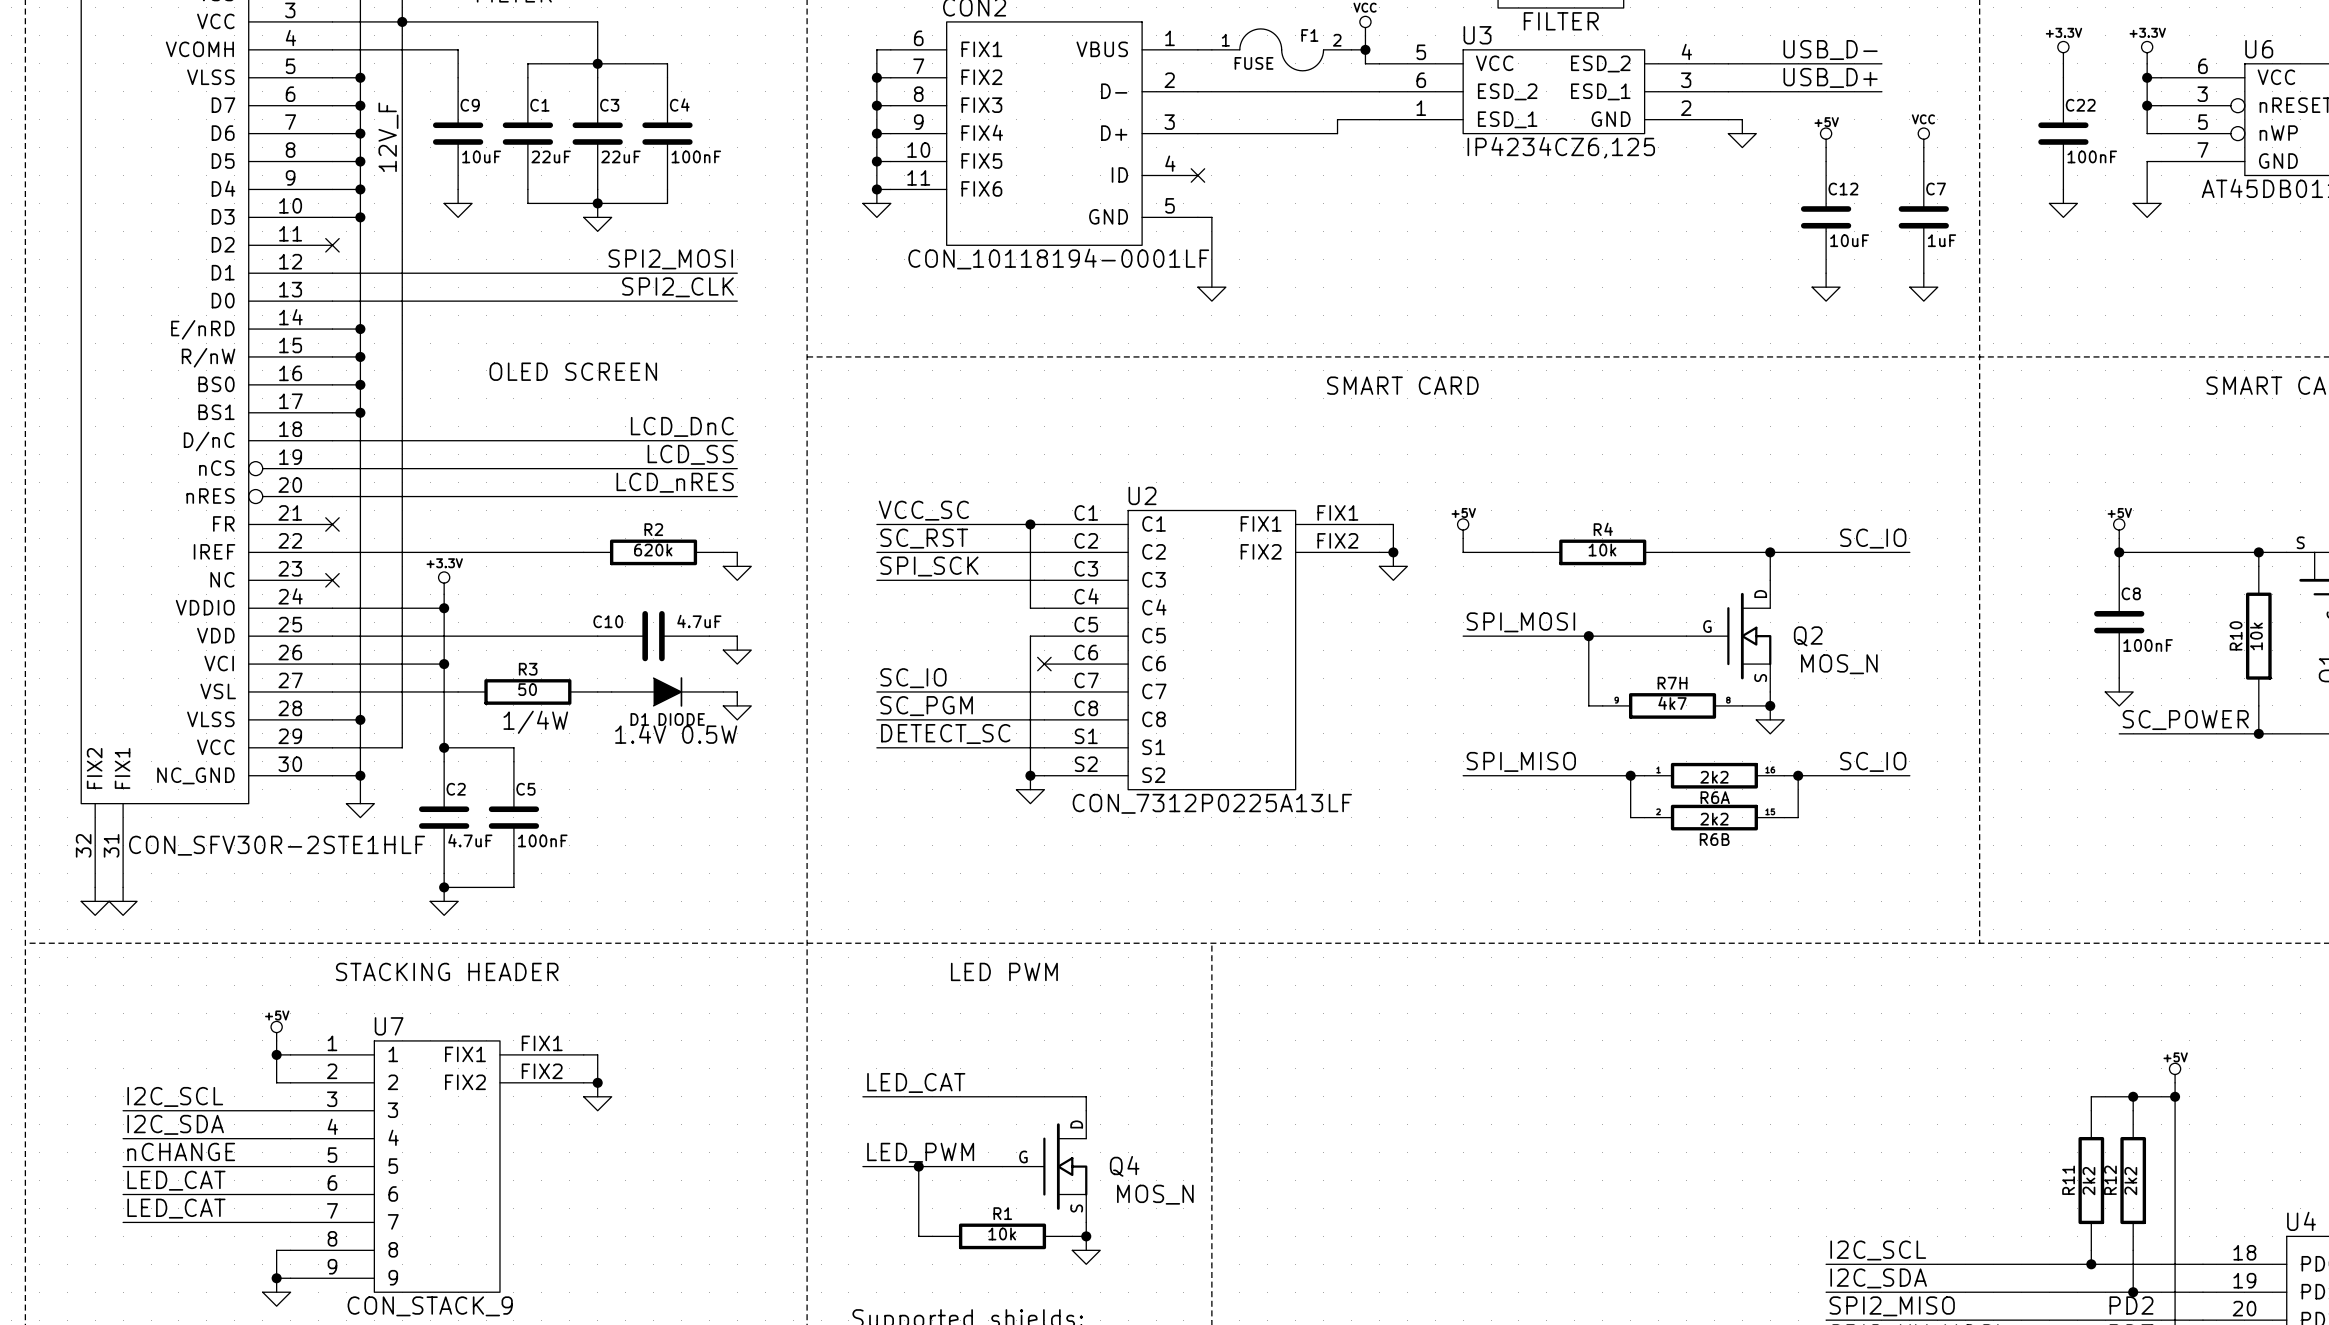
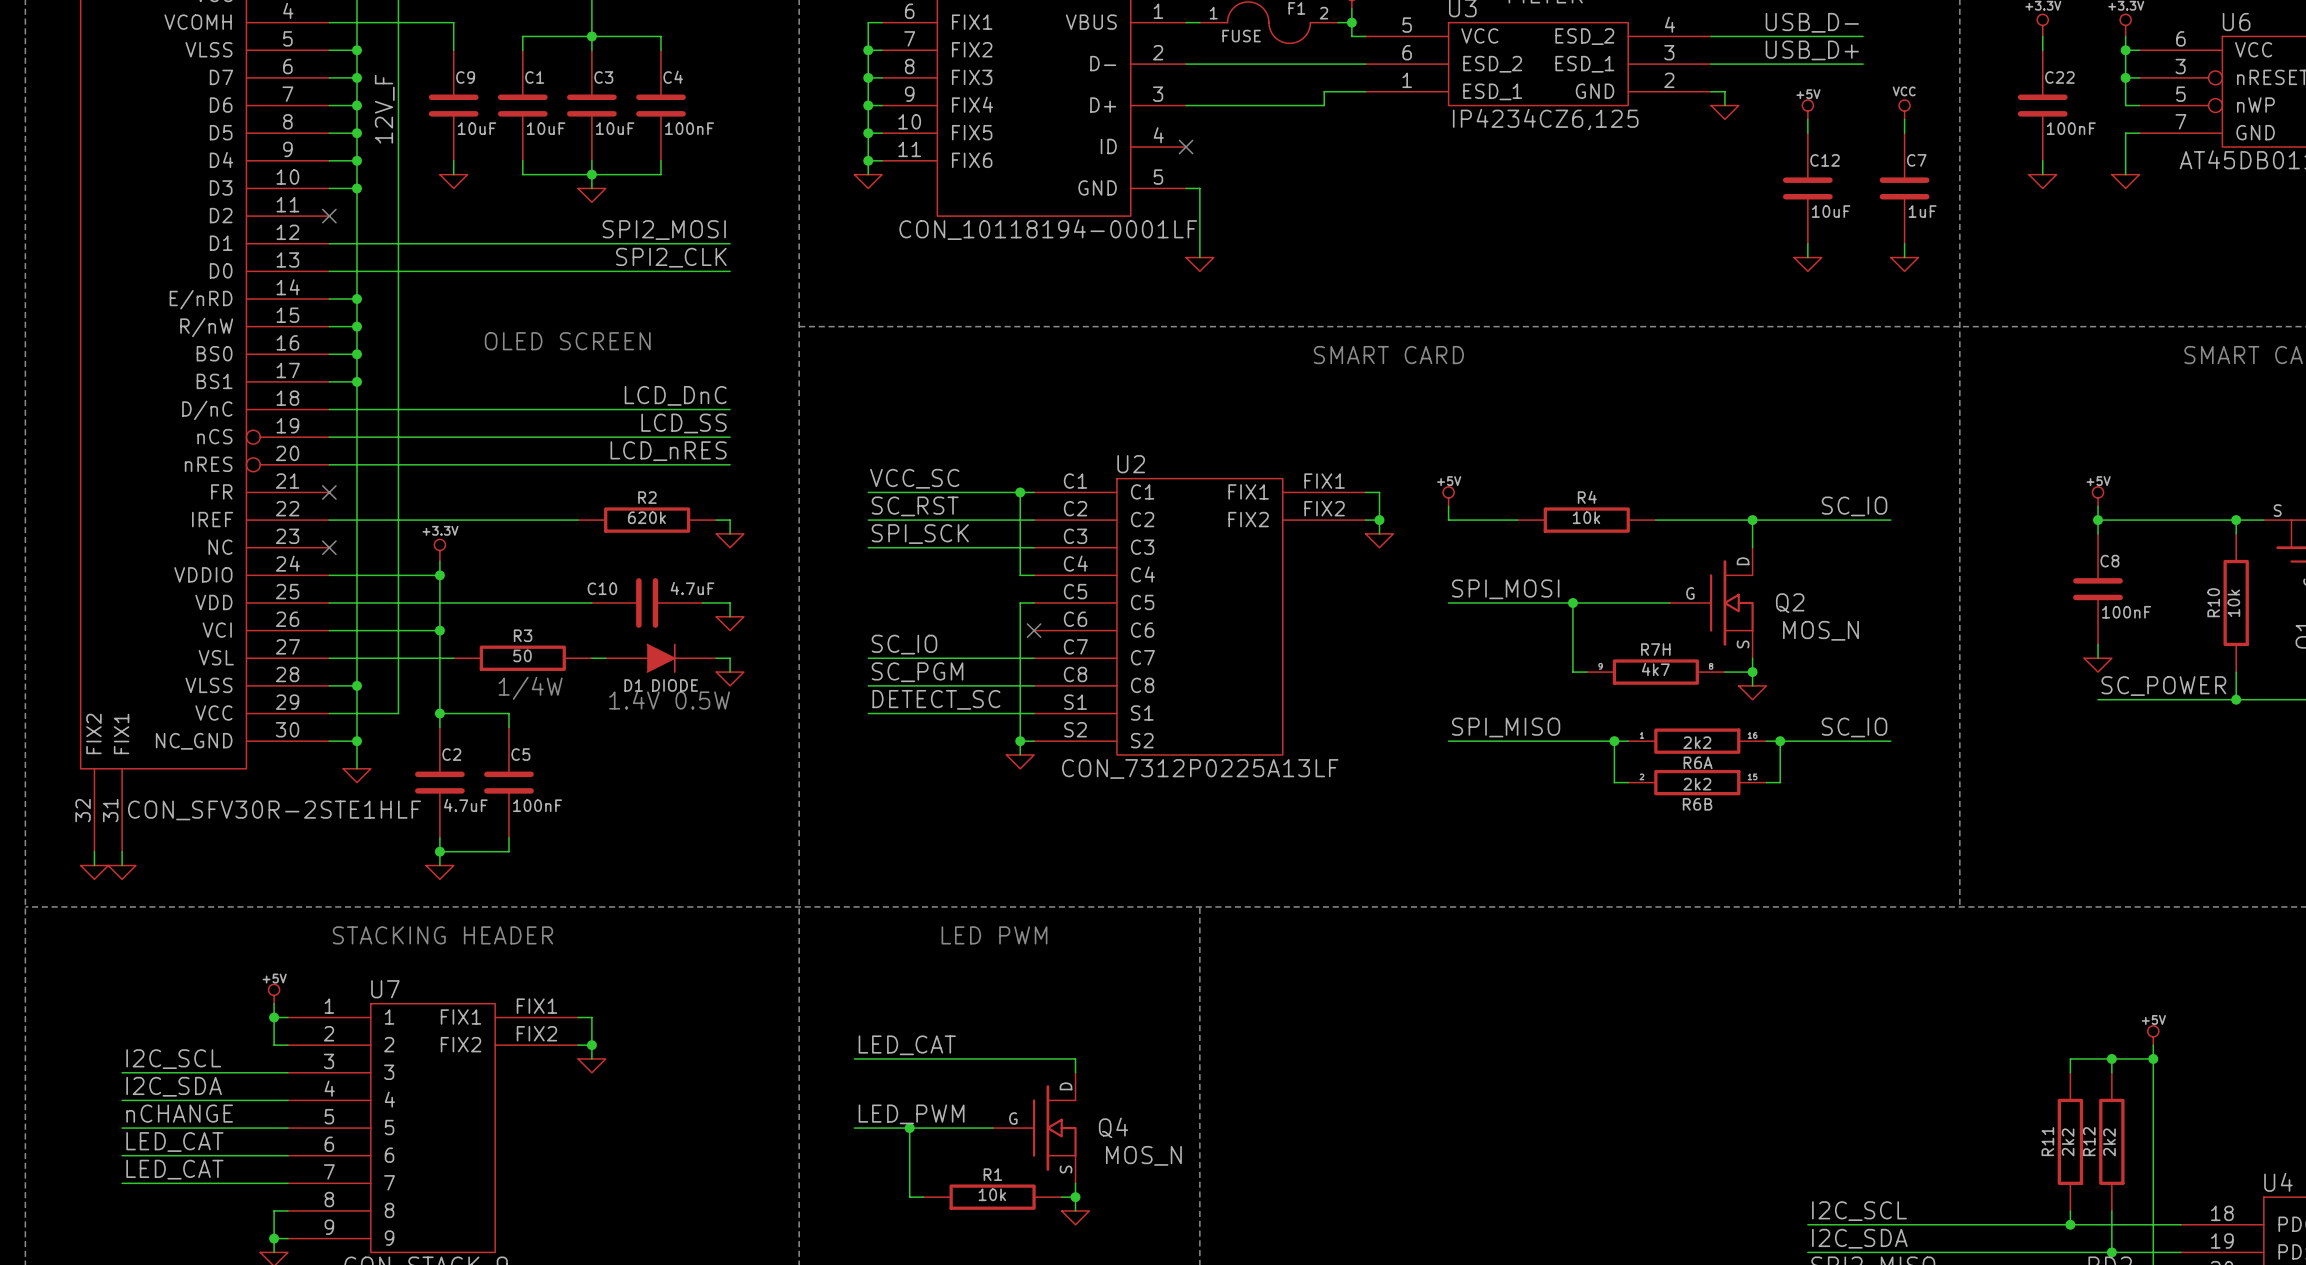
C1 value: 22uF (551, 156) -> 10uF (546, 128)
C3 value: 22uF (620, 156) -> 10uF (615, 128)

